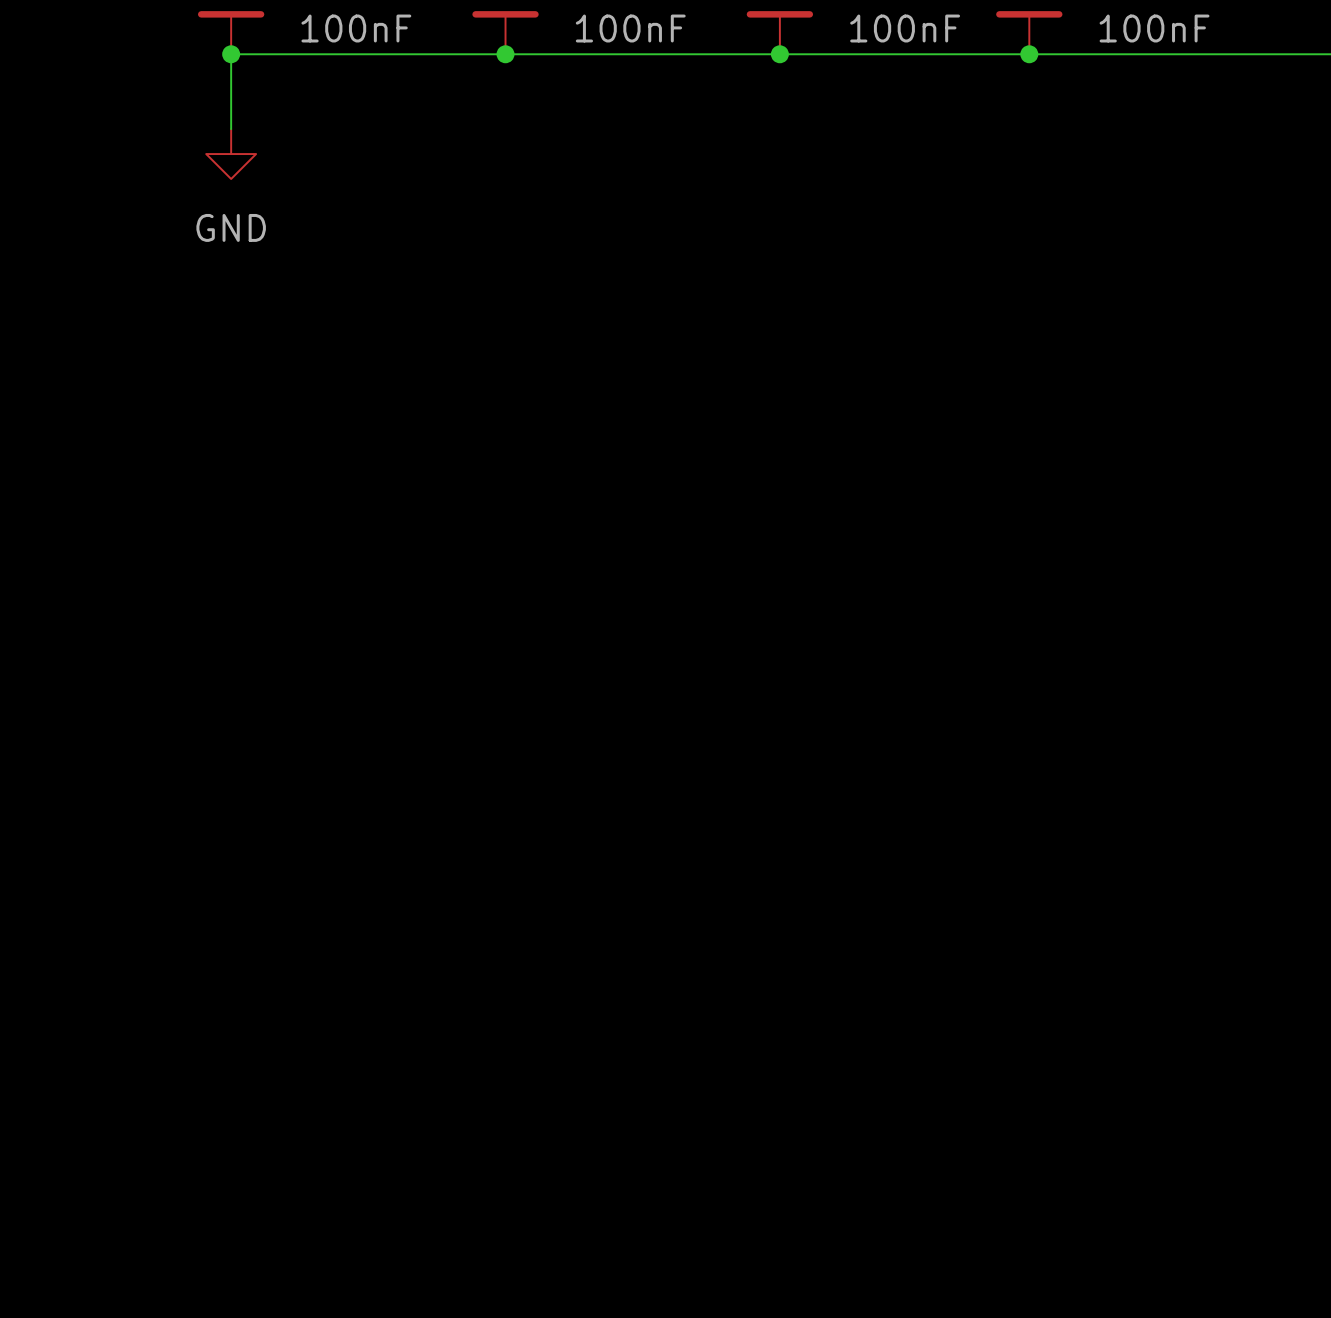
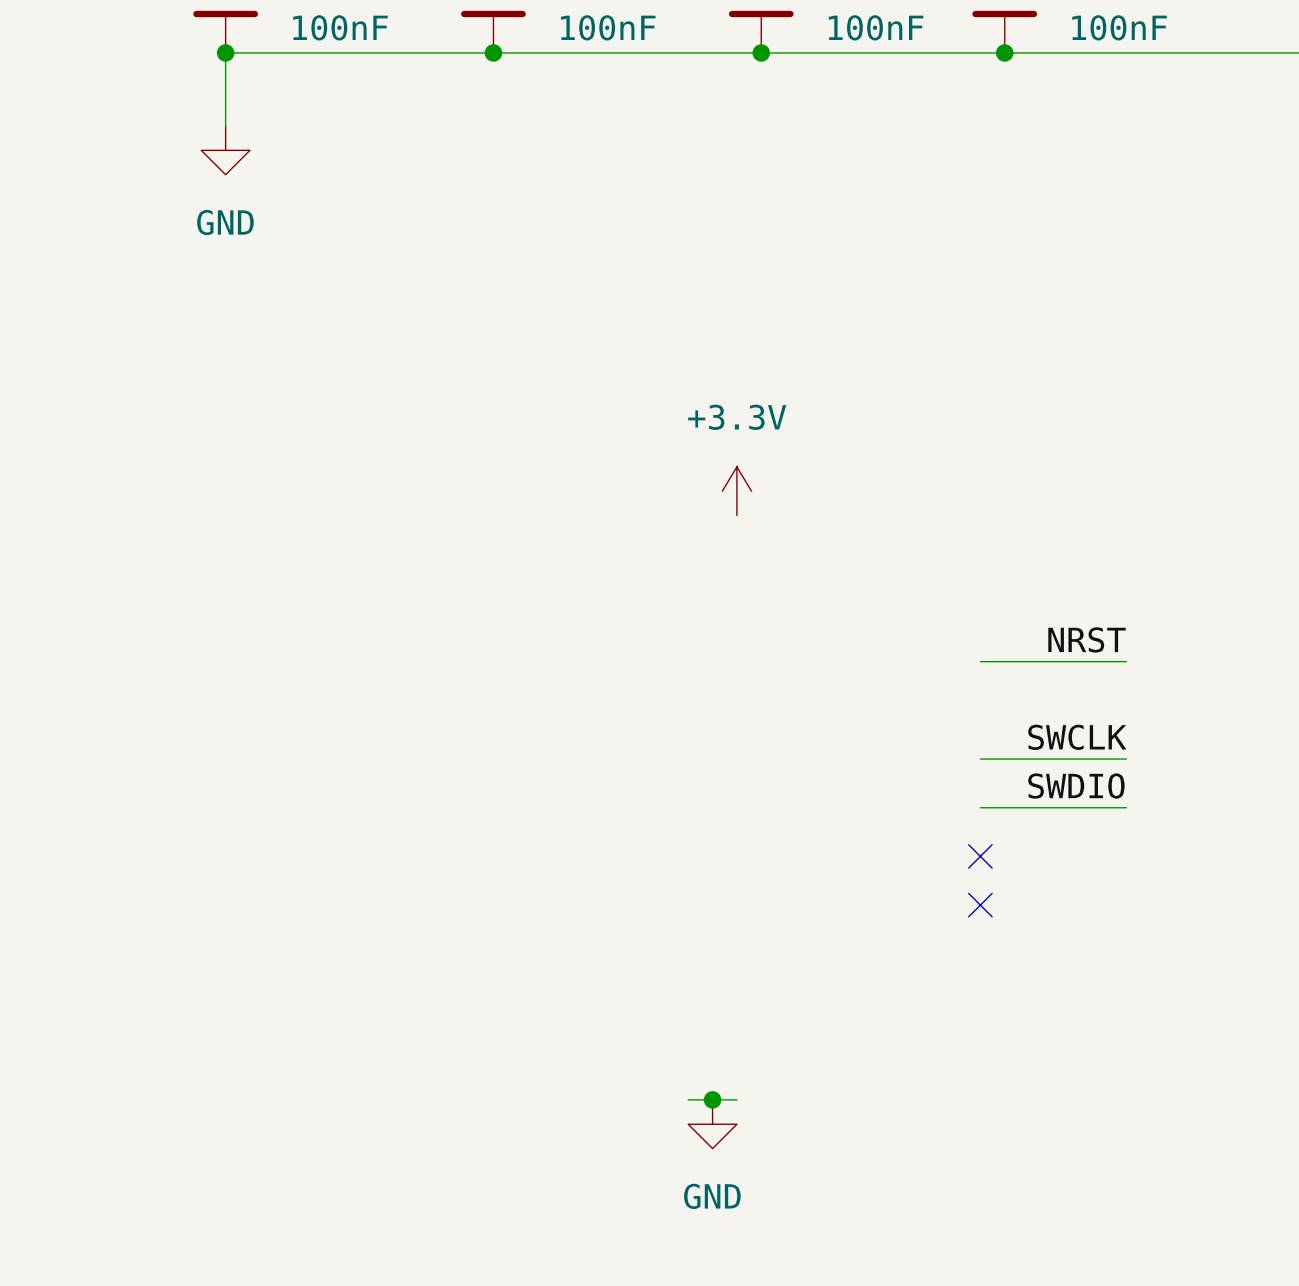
power symbol: none -> +3.3V (736, 491)
label: none -> NRST (1087, 639)
wire: none -> (980, 661) (1126, 661)
label: none -> SWCLK (1077, 737)
wire: none -> (980, 759) (1126, 759)
label: none -> SWDIO (1076, 786)
wire: none -> (980, 807) (1126, 807)
no-connect mark: none -> (980, 856)
no-connect mark: none -> (980, 905)
wire: none -> (688, 1099) (736, 1099)
junction: none -> (712, 1099)
power symbol: none -> GND (712, 1124)

